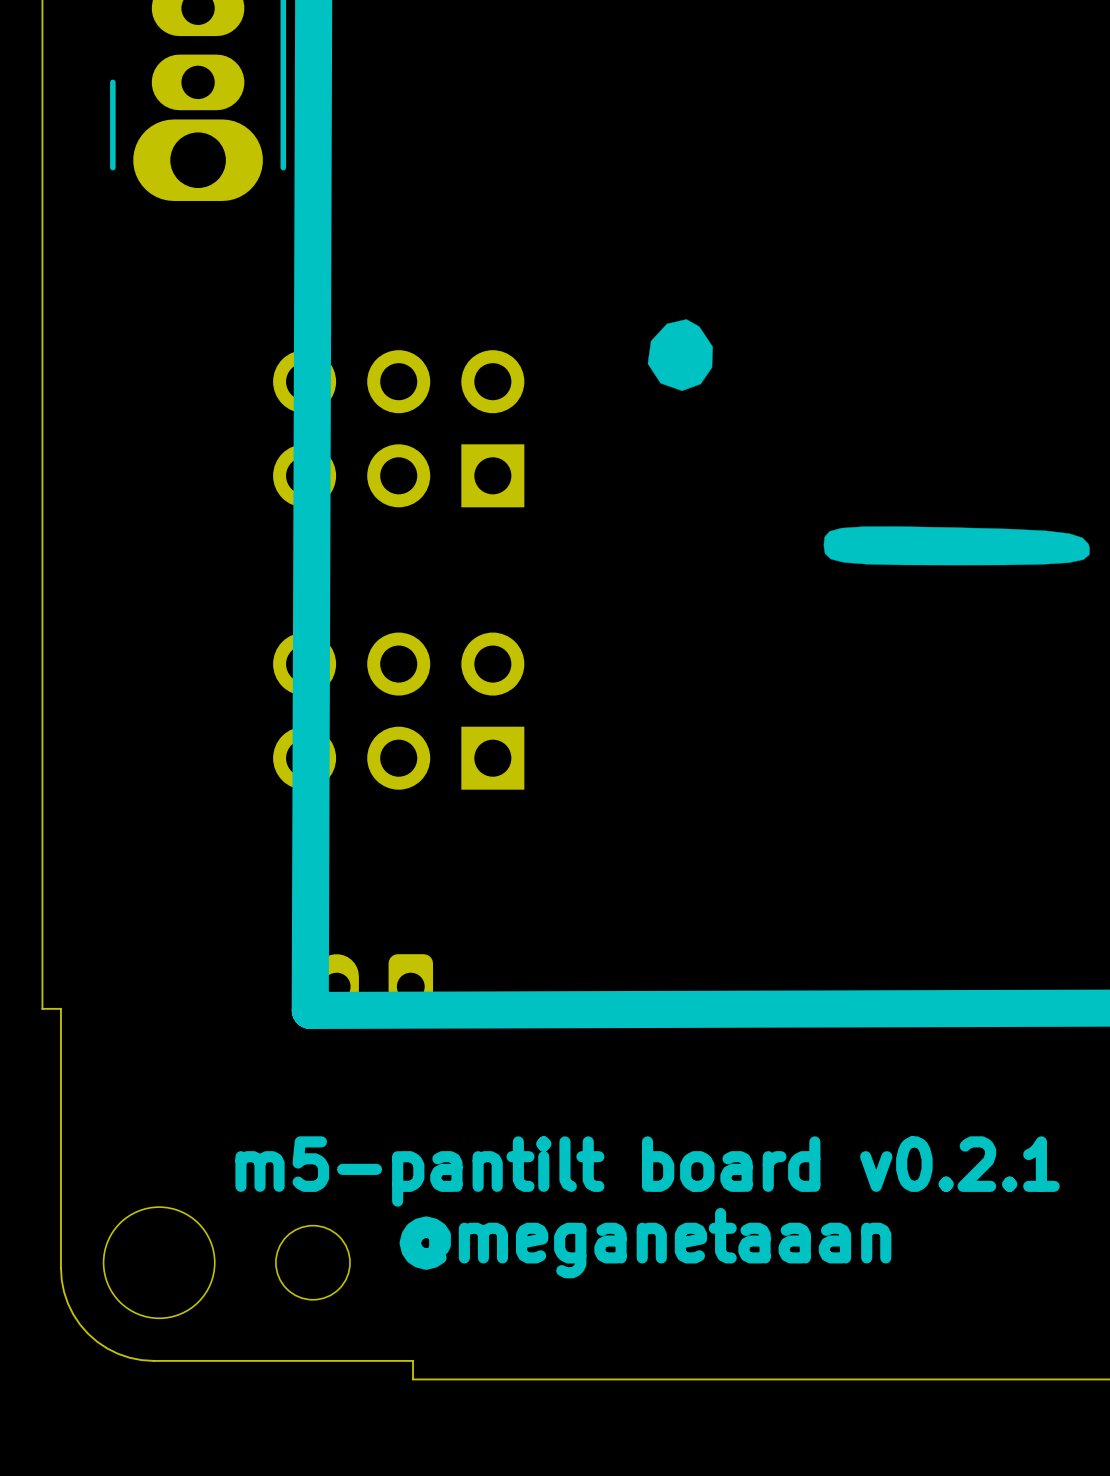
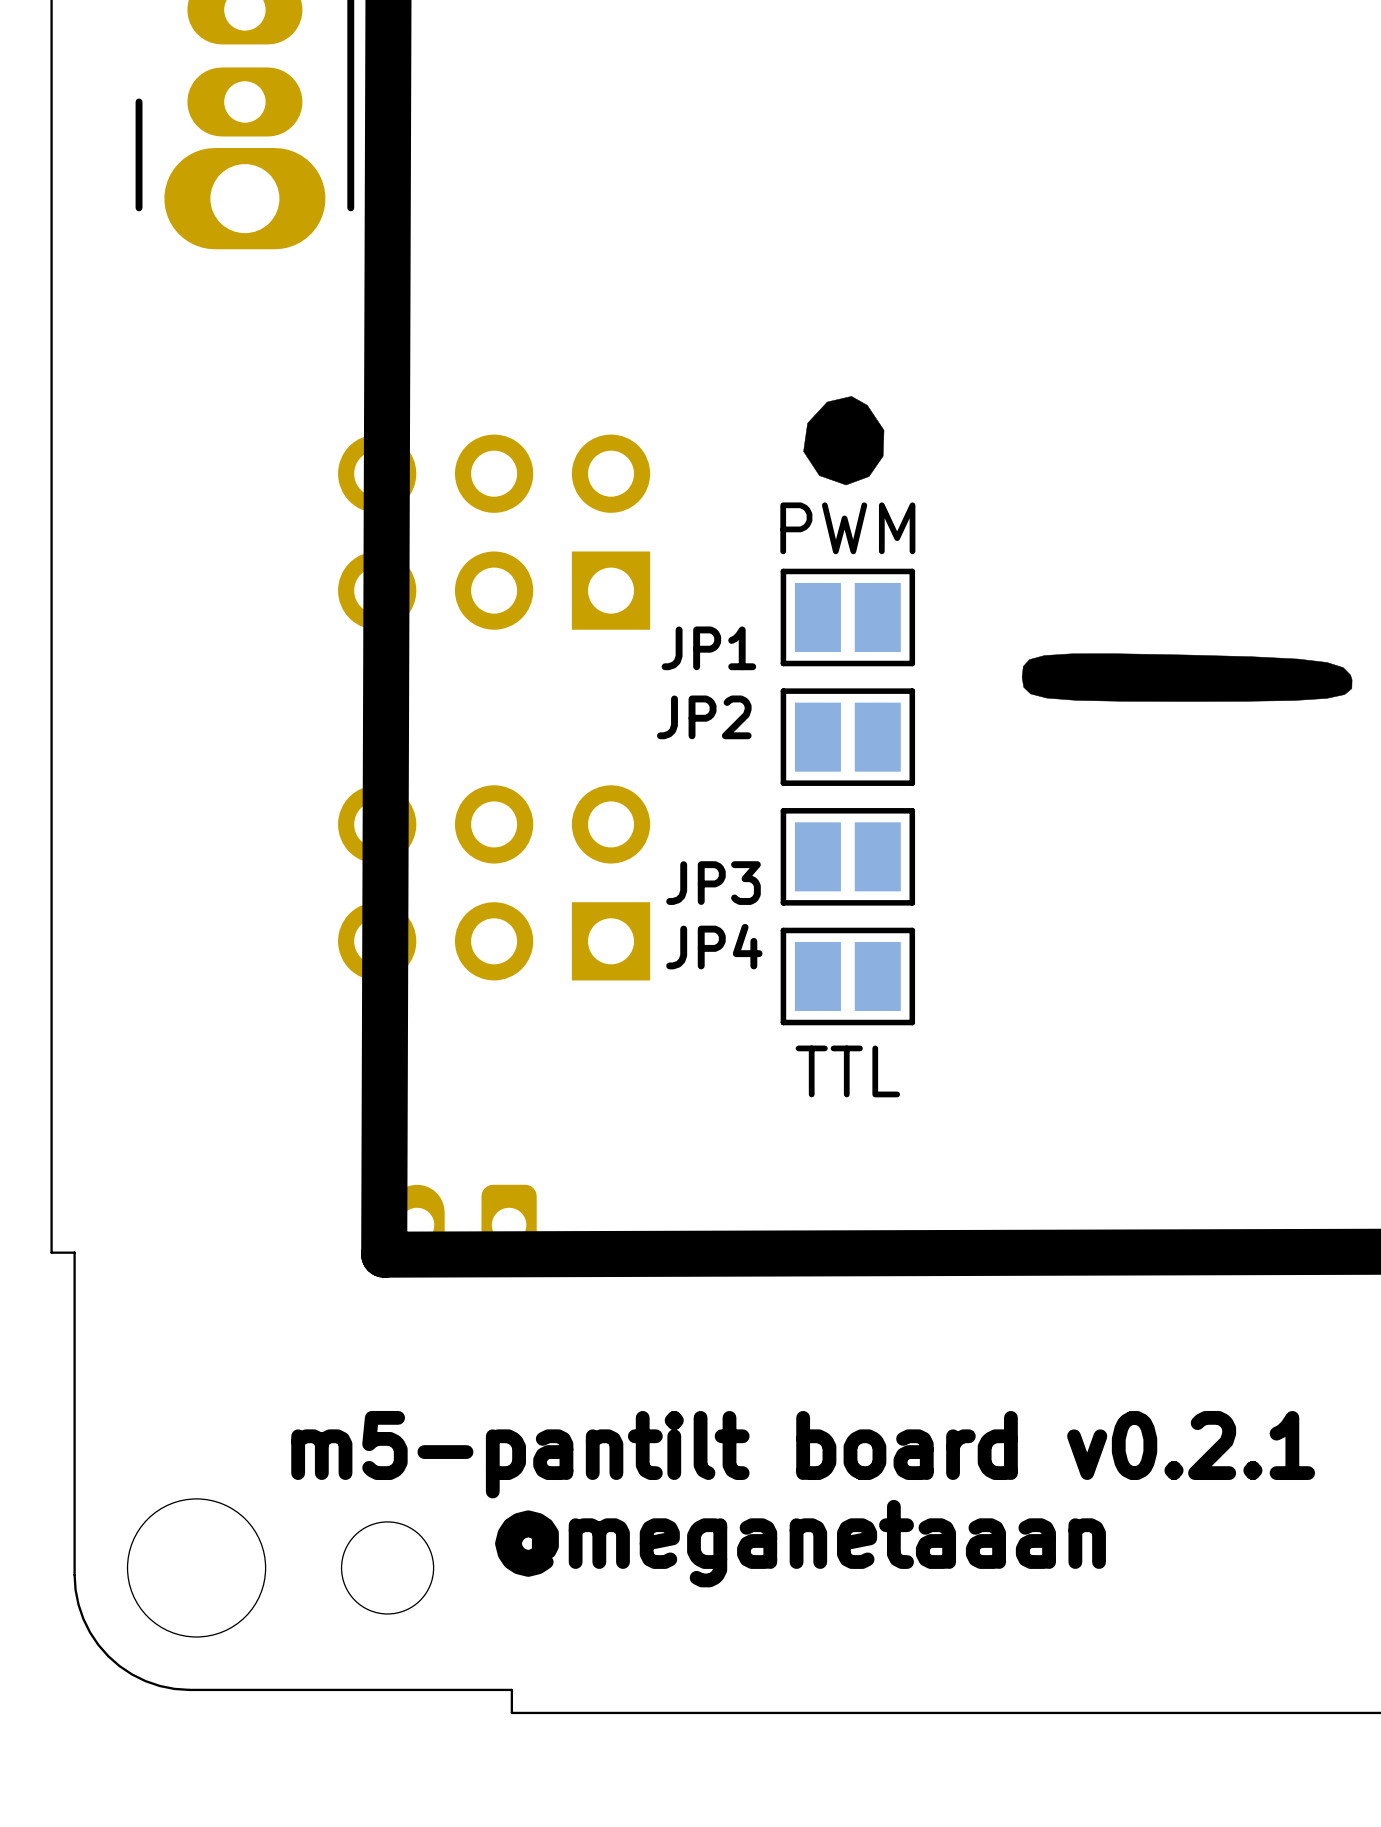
text: none -> PWM (847, 528)
JP1: none -> (847, 617)
JP2: none -> (847, 737)
JP3: none -> (847, 856)
JP4: none -> (847, 976)
text: none -> TTL (847, 1071)

